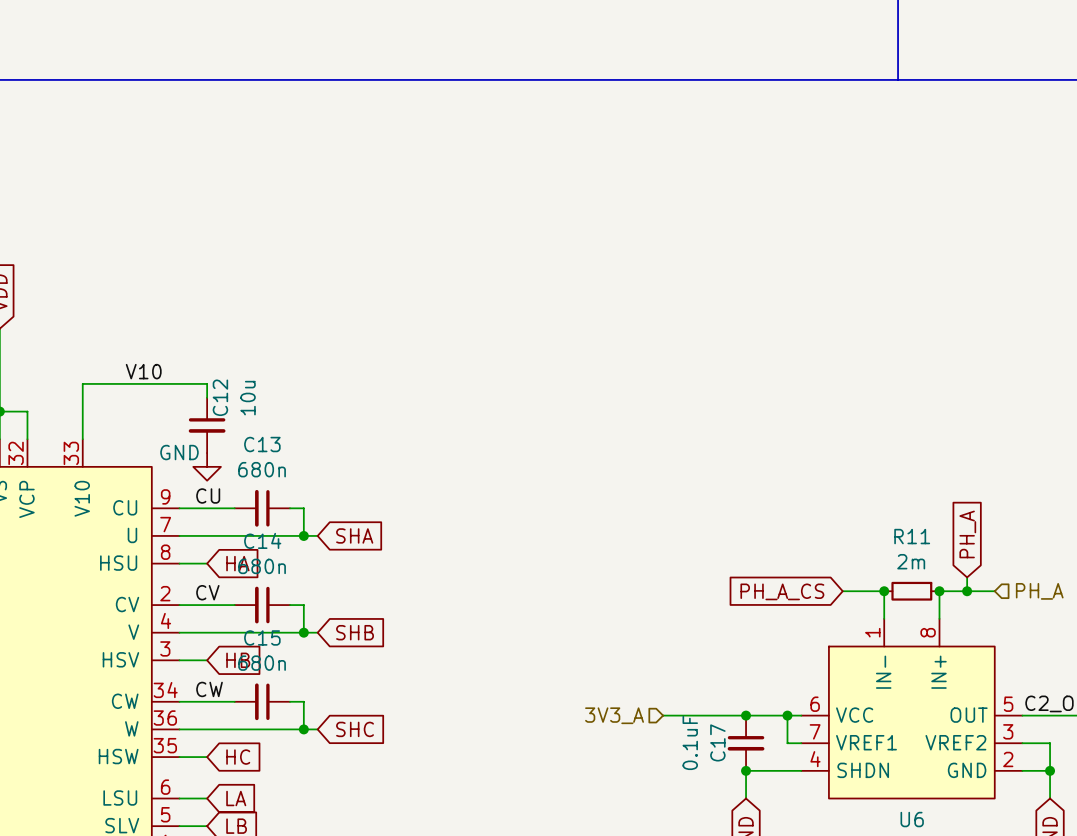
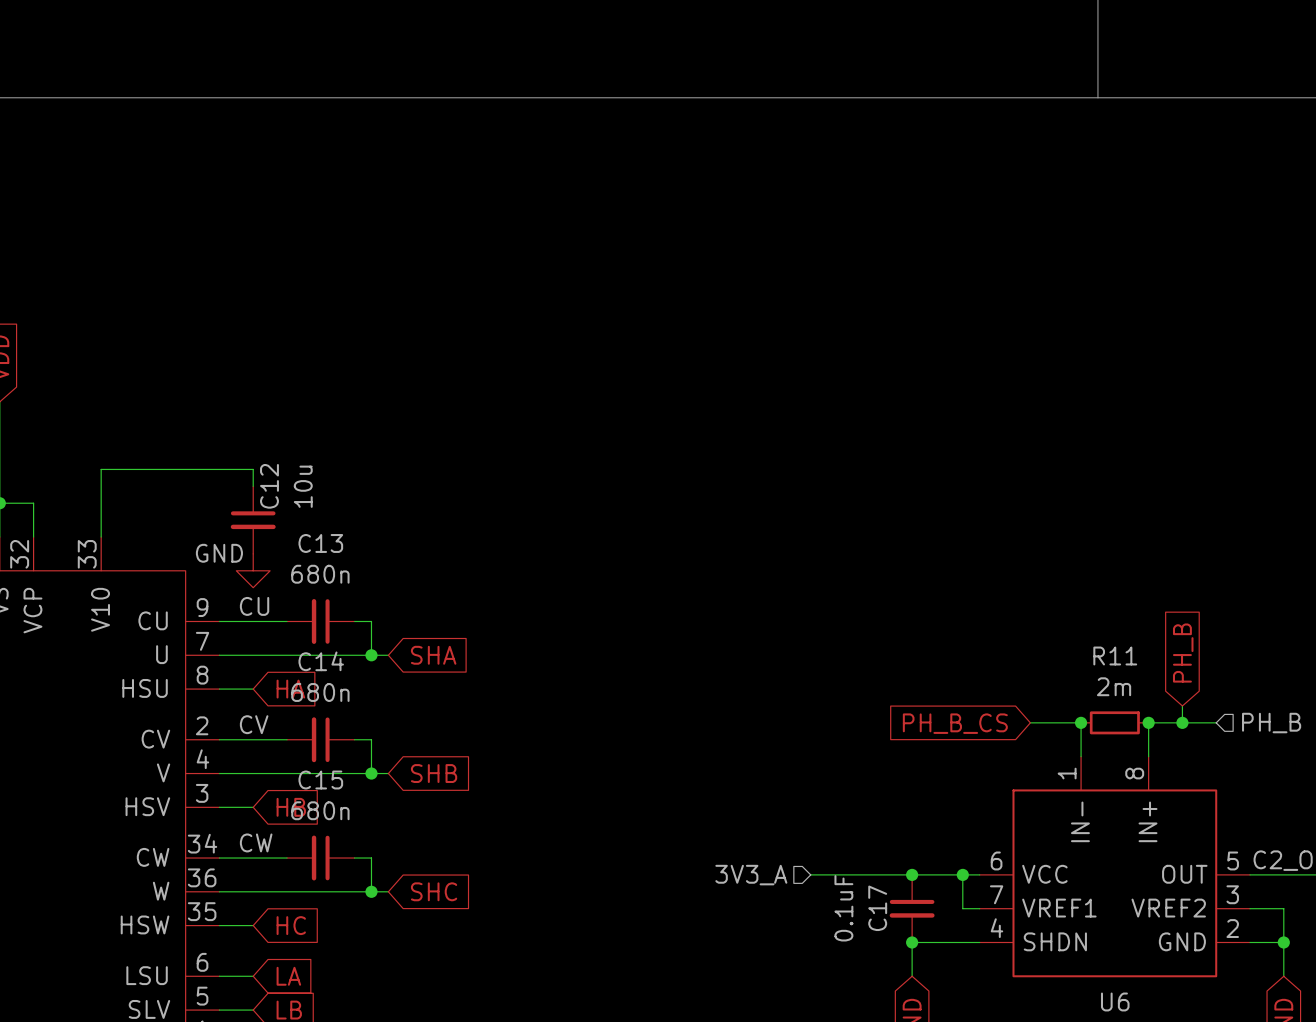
label: V10 (143, 371) -> none
global label: PH_A (967, 534) -> PH_B (1183, 653)
global label: PH_A_CS (782, 591) -> PH_B_CS (955, 723)
hierarchical label: PH_A (1039, 591) -> PH_B (1271, 723)

